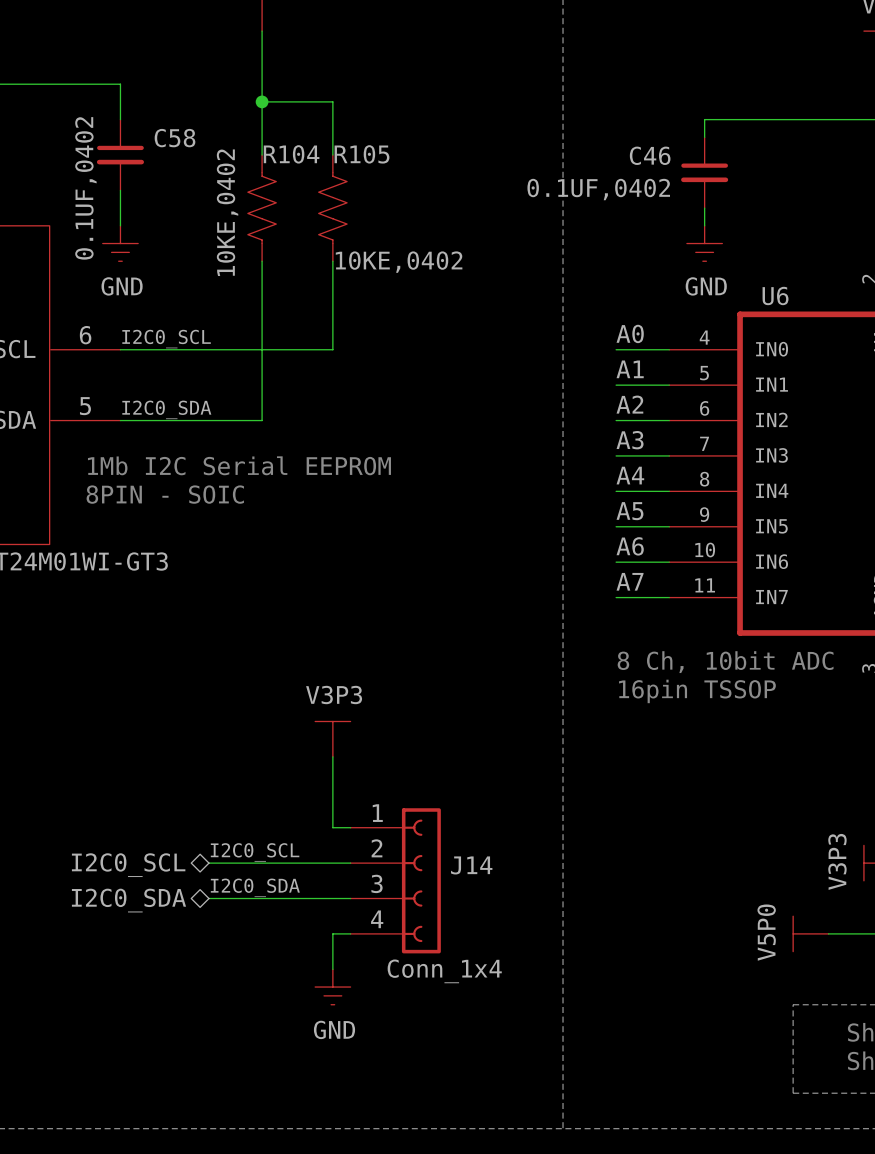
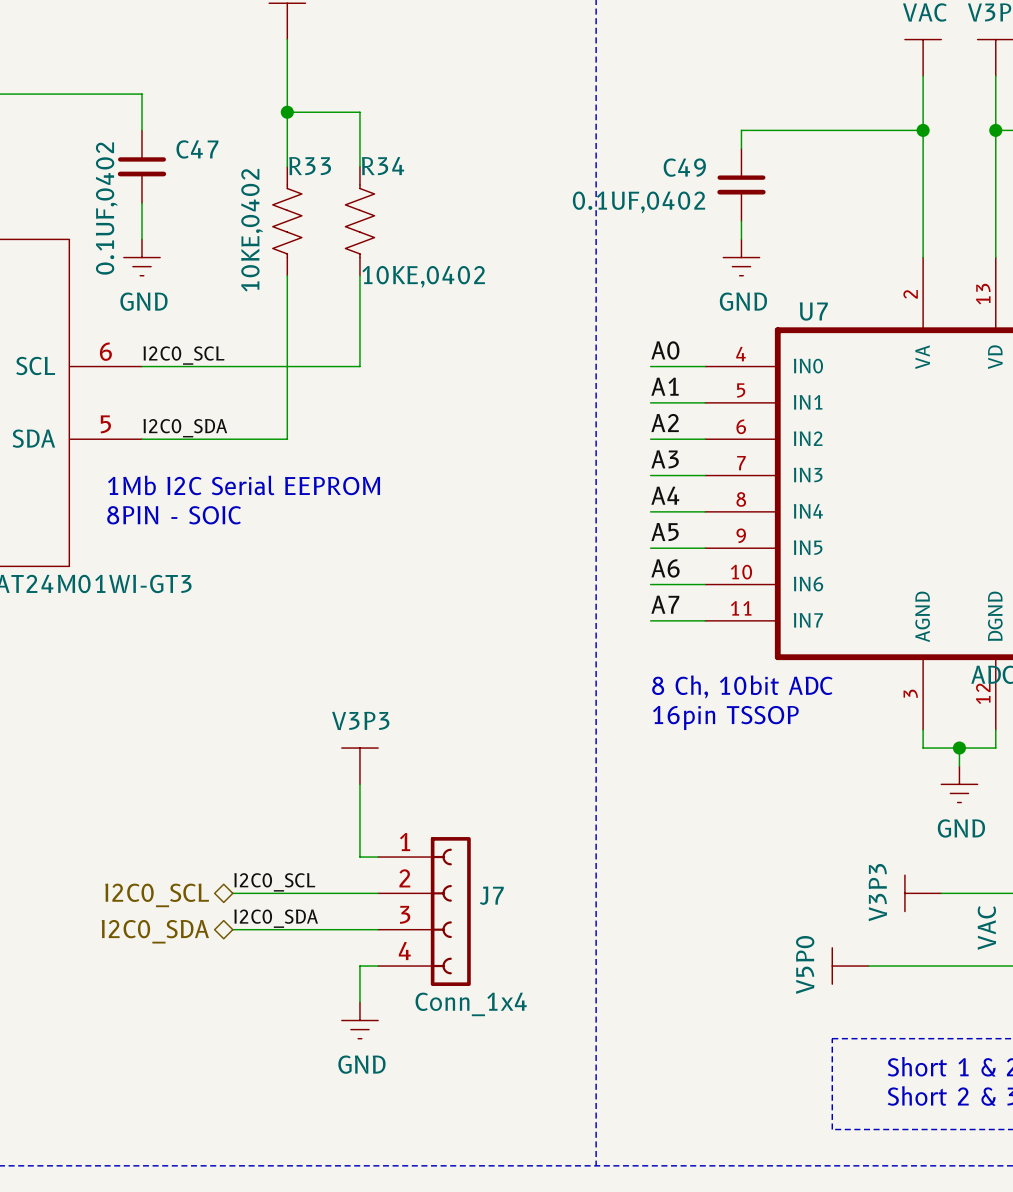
C58 name: C58 (175, 138) -> C47 (197, 149)
R104 name: R104 (291, 154) -> R33 (310, 166)
R105 name: R105 (361, 154) -> R34 (383, 166)
C46 name: C46 (650, 155) -> C49 (684, 167)
U6 name: U6 (775, 295) -> U7 (813, 311)
J14 name: J14 (471, 865) -> J7 (491, 895)

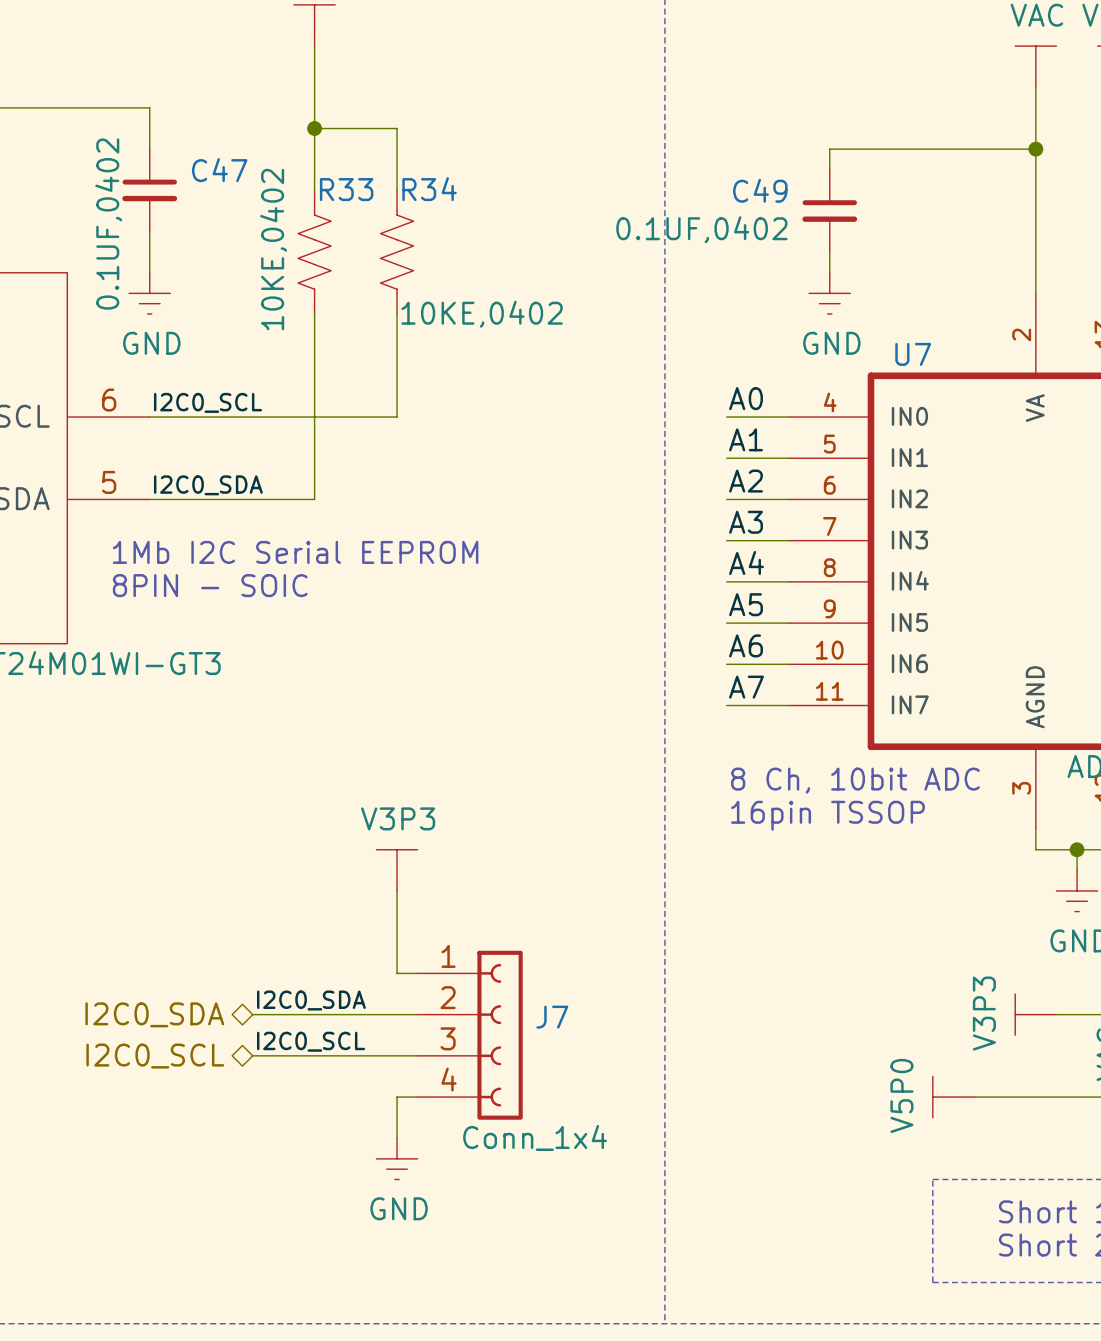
label: I2C0_SCL (274, 882) -> I2C0_SDA (311, 1000)
hierarchical label: I2C0_SCL (157, 895) -> I2C0_SDA (154, 1014)
label: I2C0_SDA (276, 918) -> I2C0_SCL (311, 1041)
hierarchical label: I2C0_SDA (155, 931) -> I2C0_SCL (155, 1056)

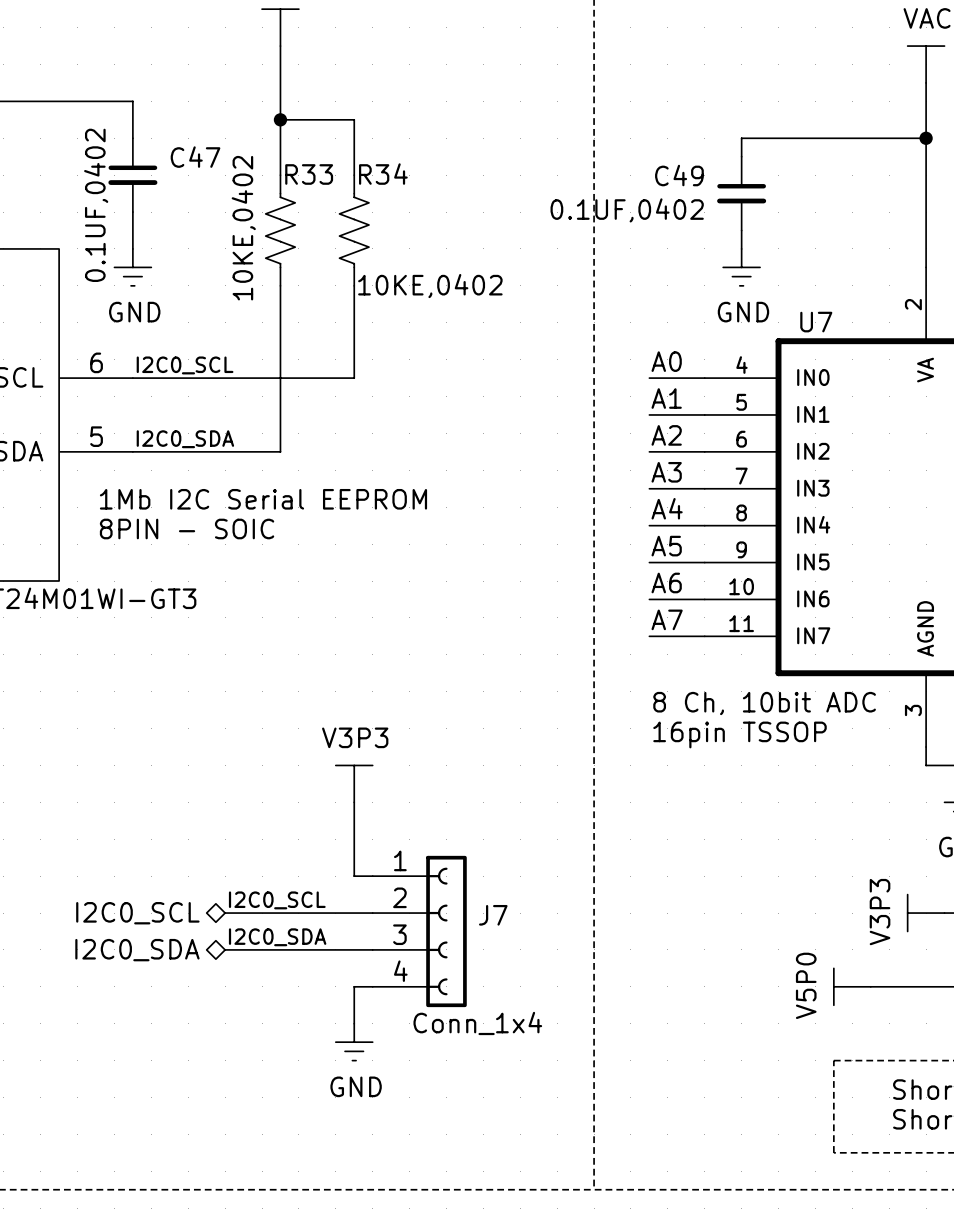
label: I2C0_SDA (311, 1000) -> I2C0_SCL (277, 900)
hierarchical label: I2C0_SDA (154, 1014) -> I2C0_SCL (137, 913)
label: I2C0_SCL (311, 1041) -> I2C0_SDA (277, 937)
hierarchical label: I2C0_SCL (155, 1056) -> I2C0_SDA (137, 950)

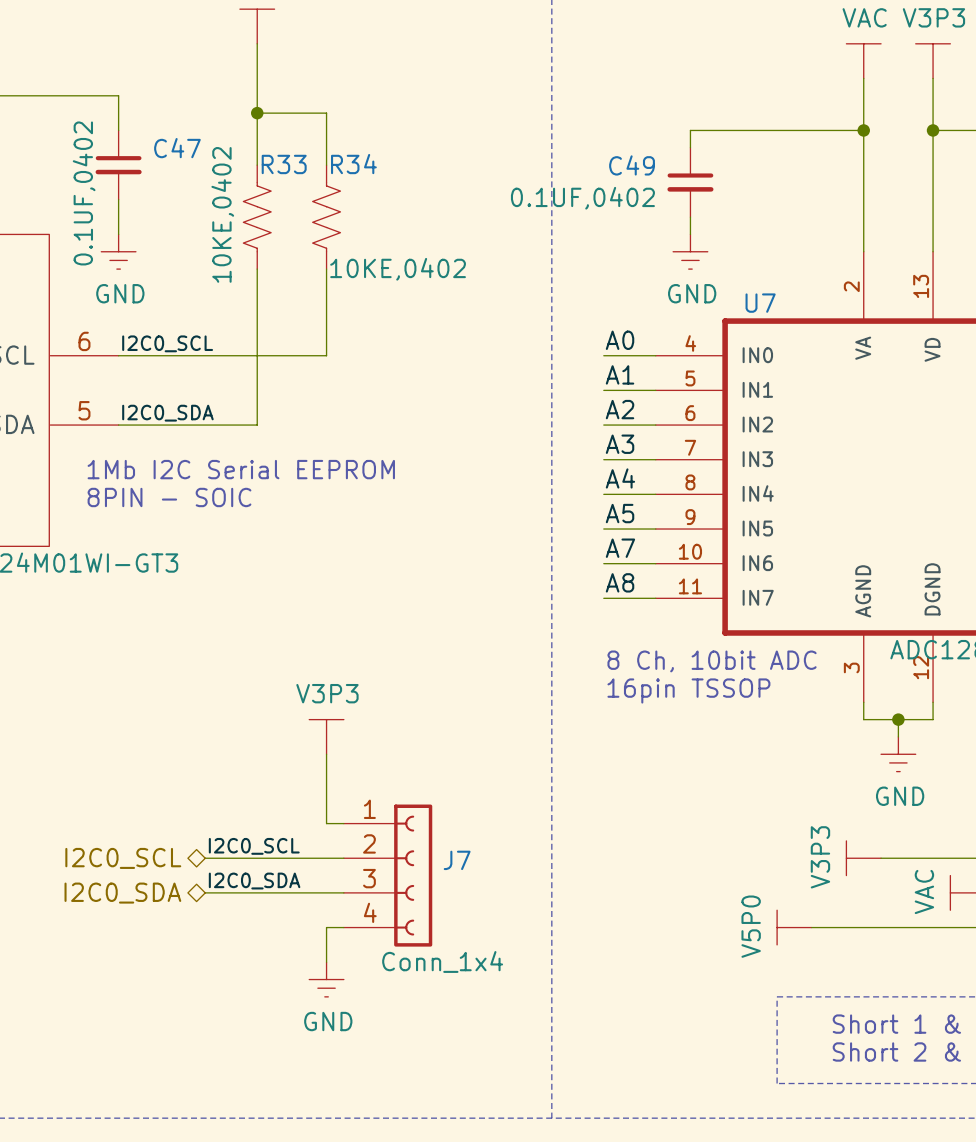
label: A6 (666, 582) -> A7 (620, 548)
label: A7 (667, 619) -> A8 (620, 582)

